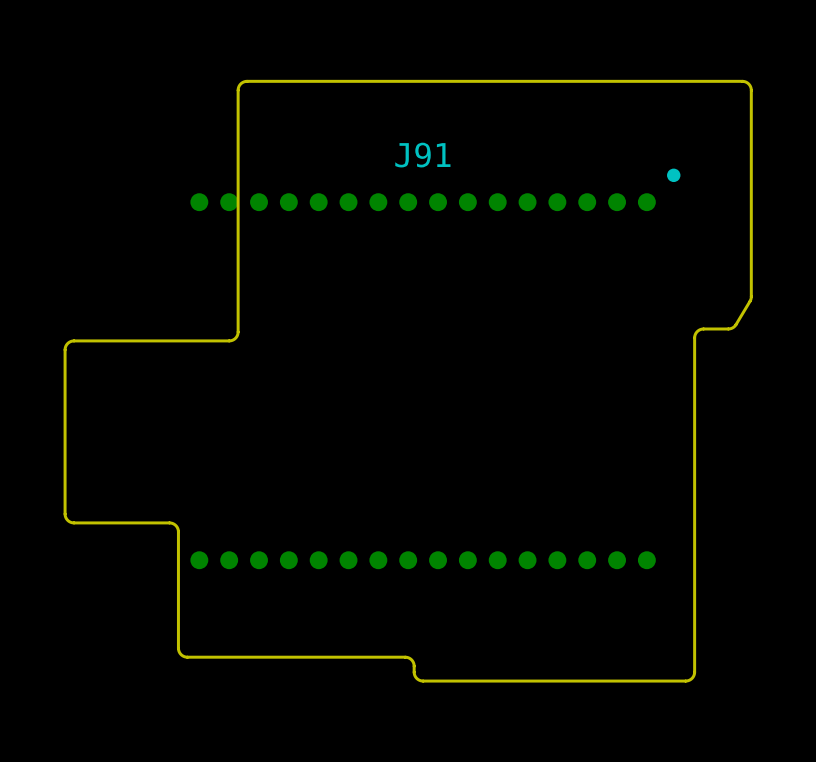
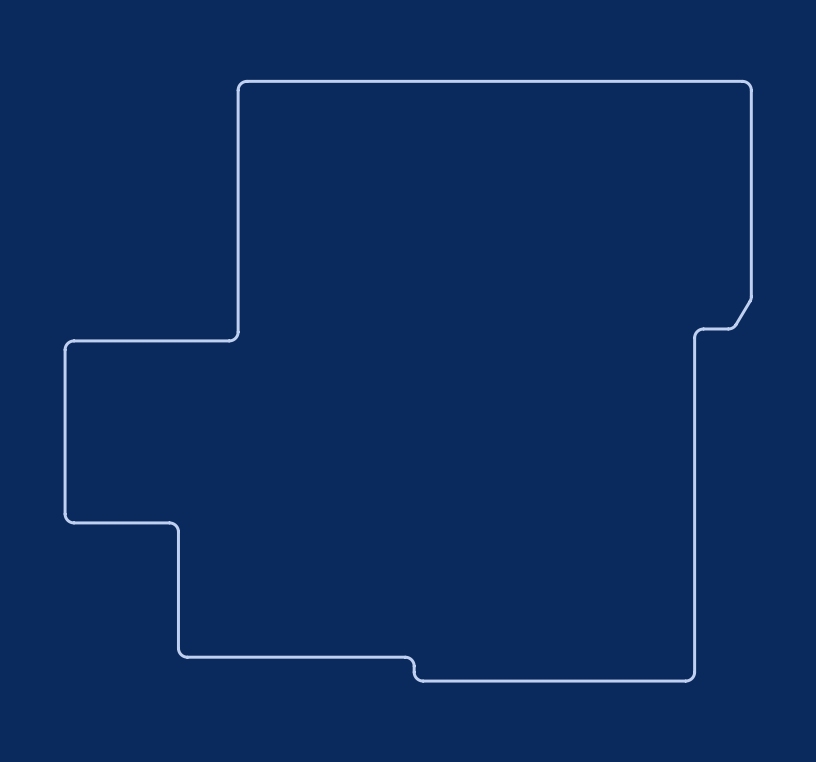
J91: (435, 368) -> none

